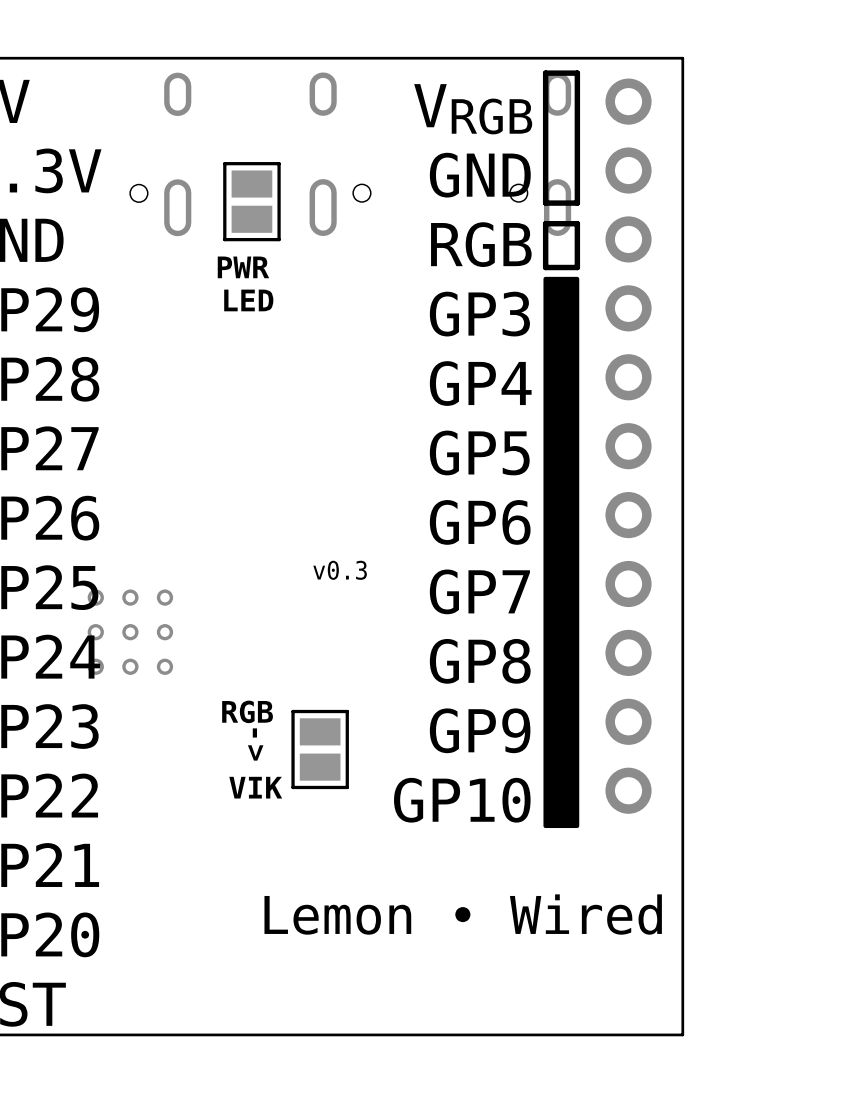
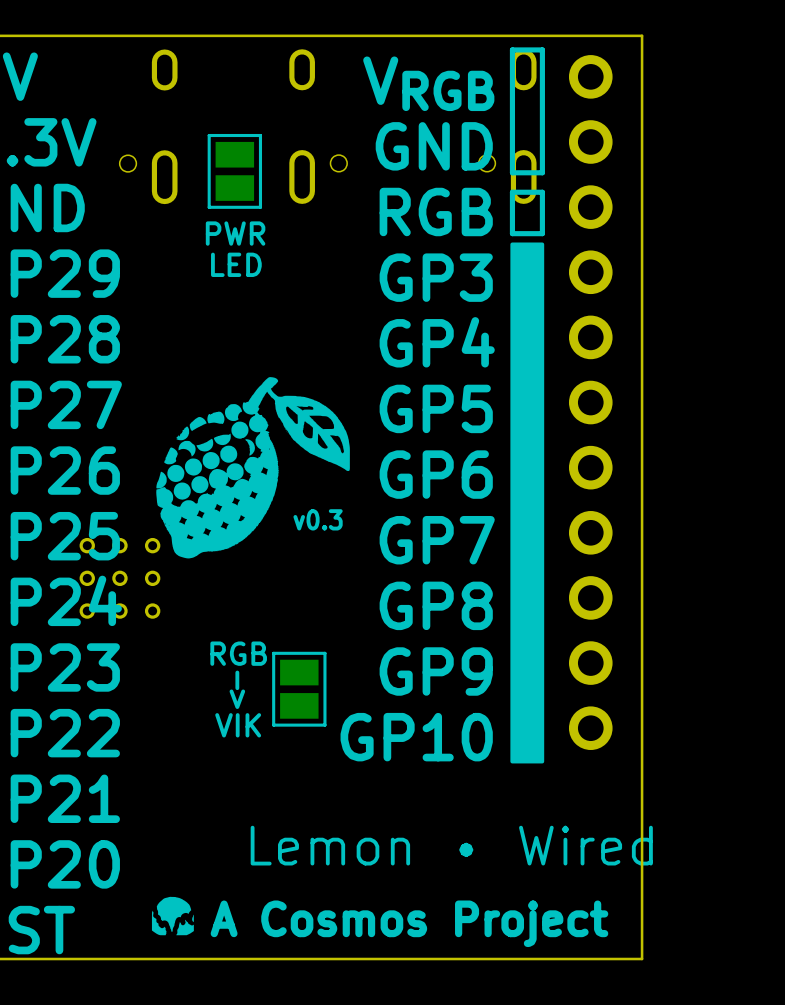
drawing: none -> [156, 377, 350, 559]
drawing: none -> [151, 896, 194, 936]
text: none -> A Cosmos Project (409, 923)

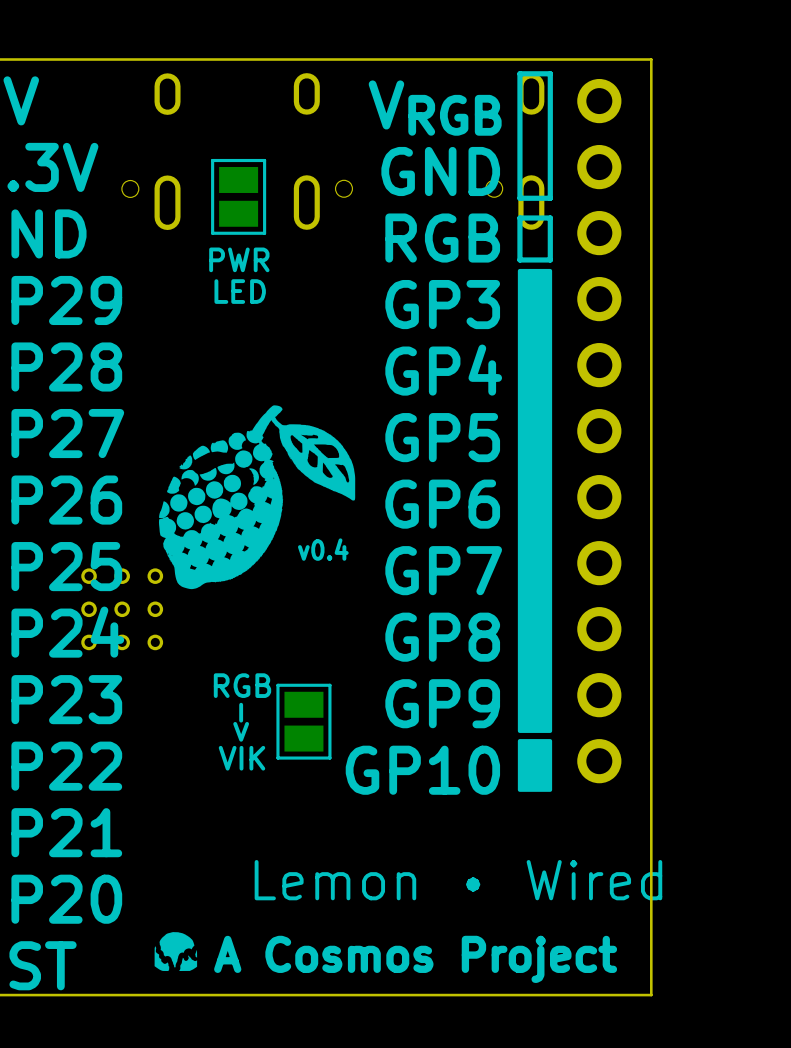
drawing: [510, 242, 545, 764] -> none
drawing: none -> [517, 268, 553, 792]
text: v0.3 (318, 519) -> v0.4 (323, 549)

